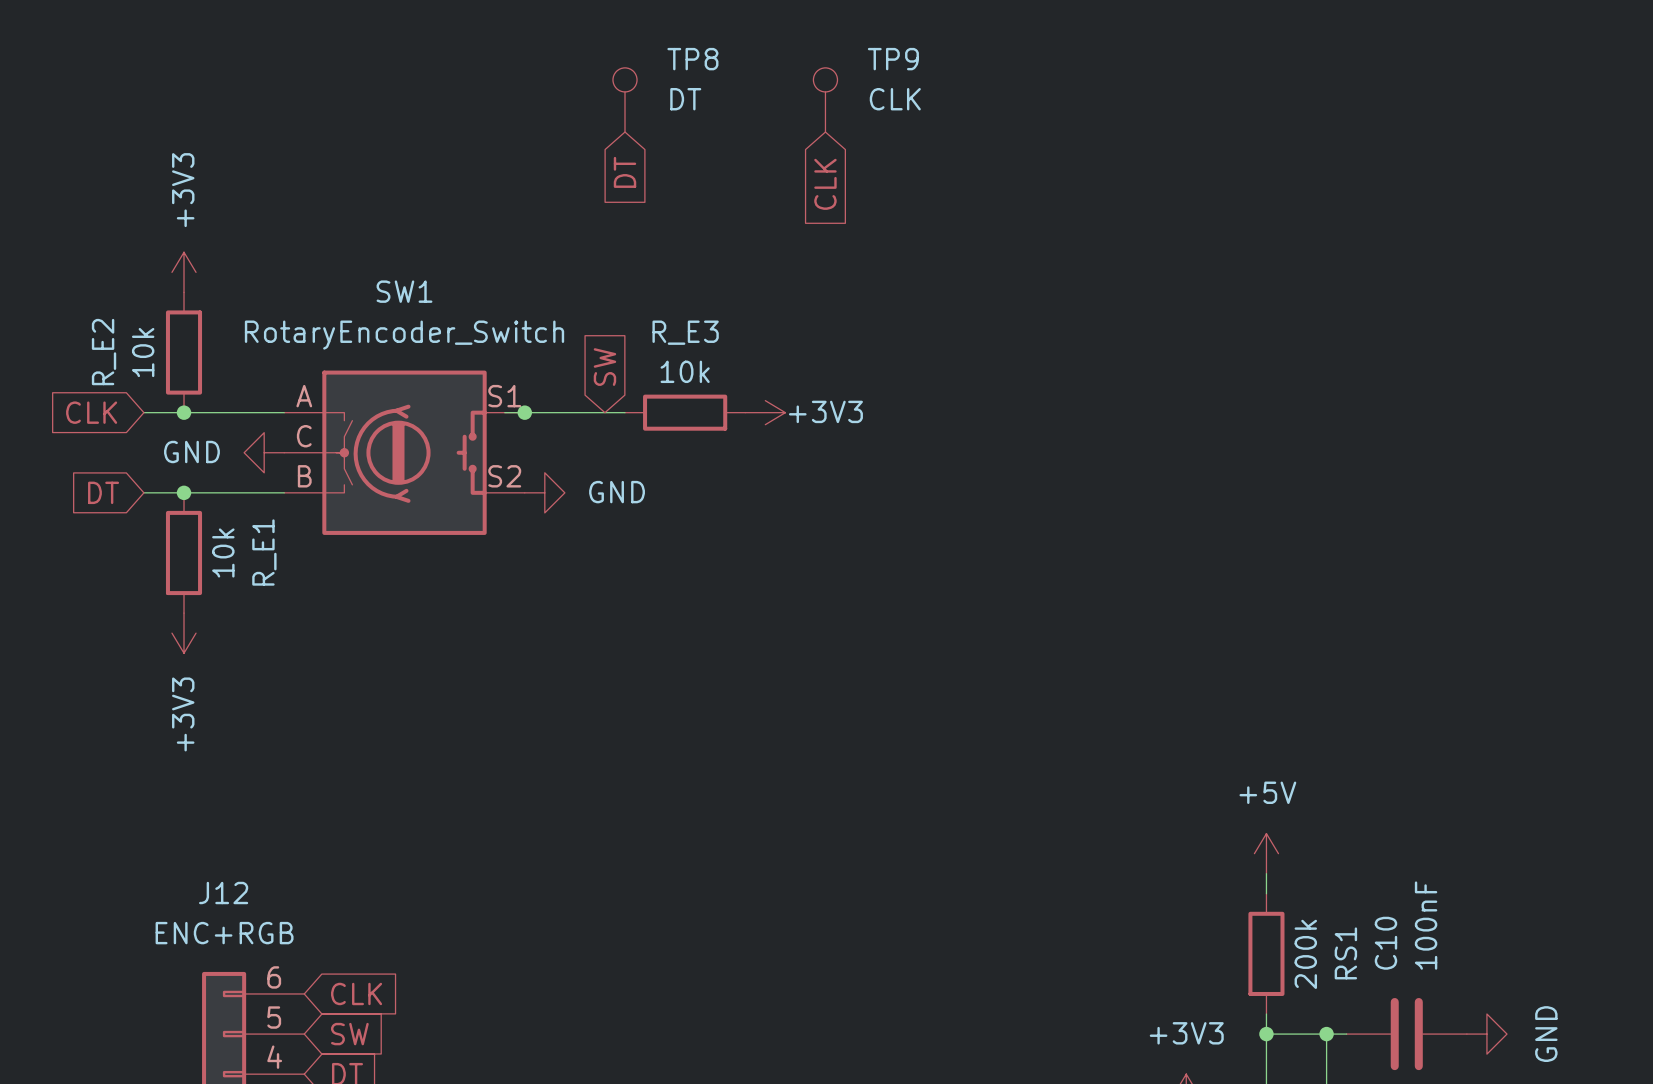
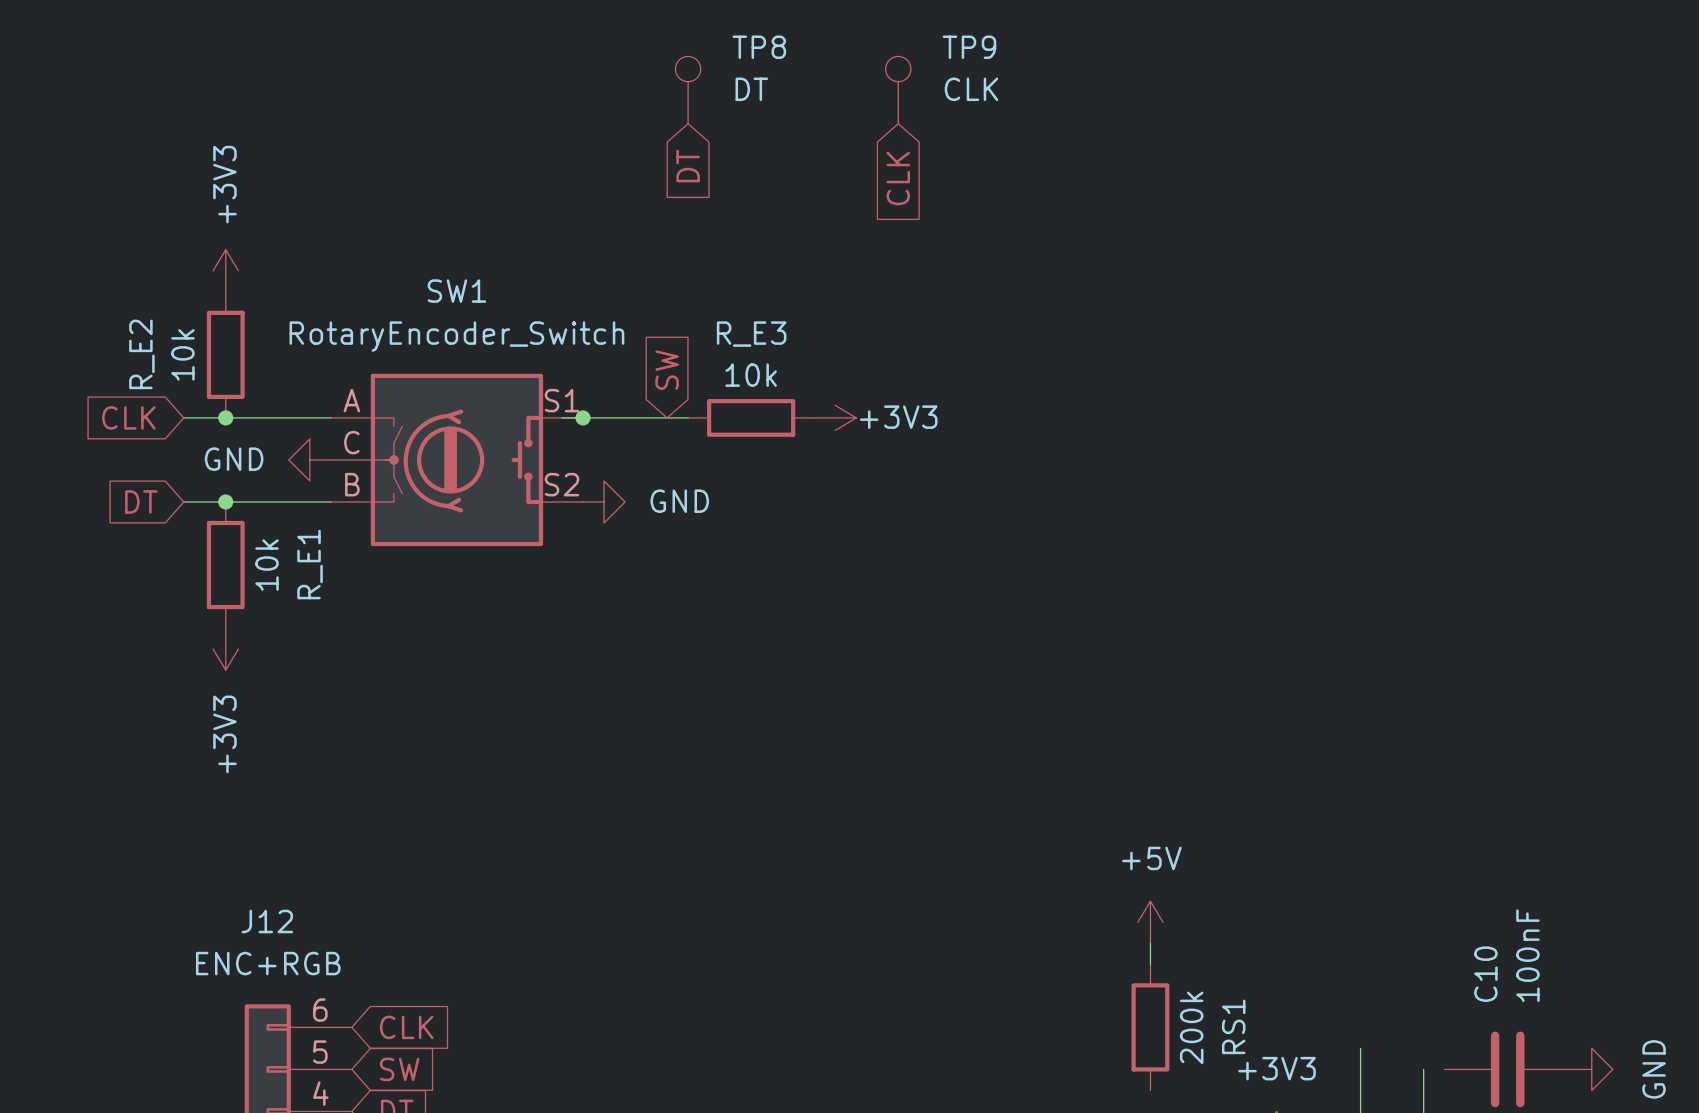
power symbol position: +5V (1266, 853) -> +5V (1150, 922)
wire: (1266, 873) (1266, 893) -> (1150, 943) (1150, 964)
RS1 position: (1266, 953) -> (1150, 1027)
wire: (1266, 1034) (1346, 1034) -> none
junction: (1266, 1034) -> none
junction: (1326, 1034) -> none

